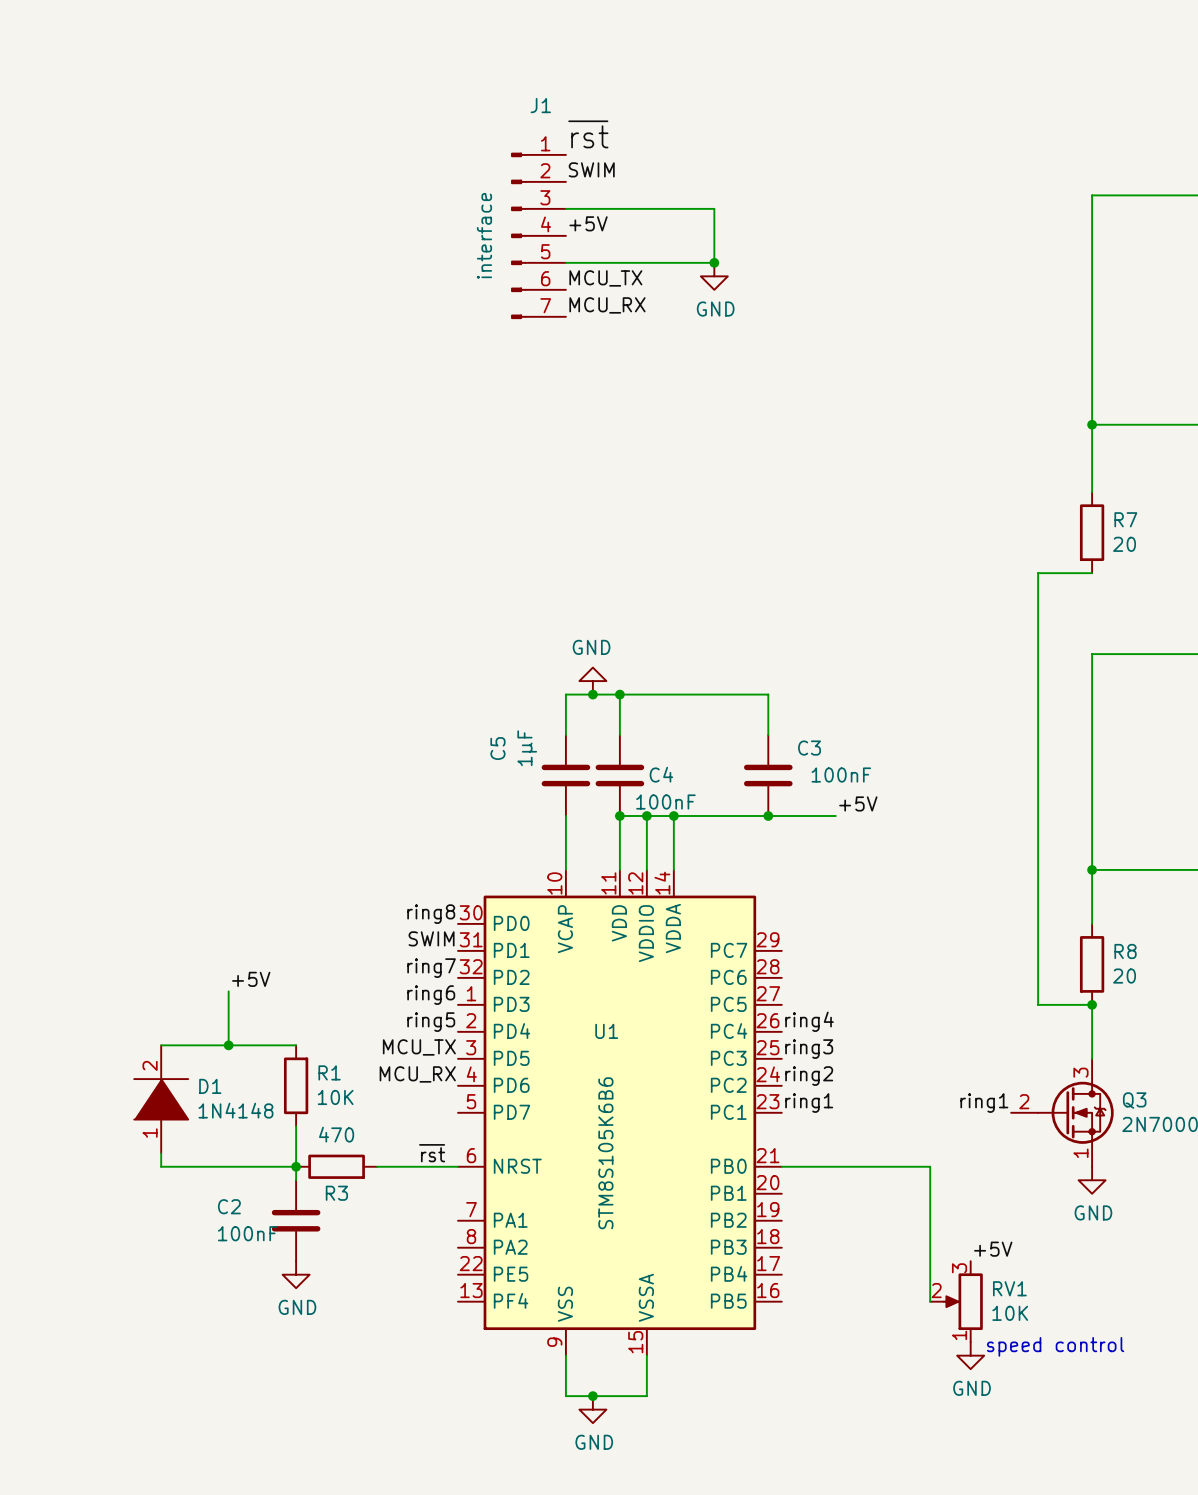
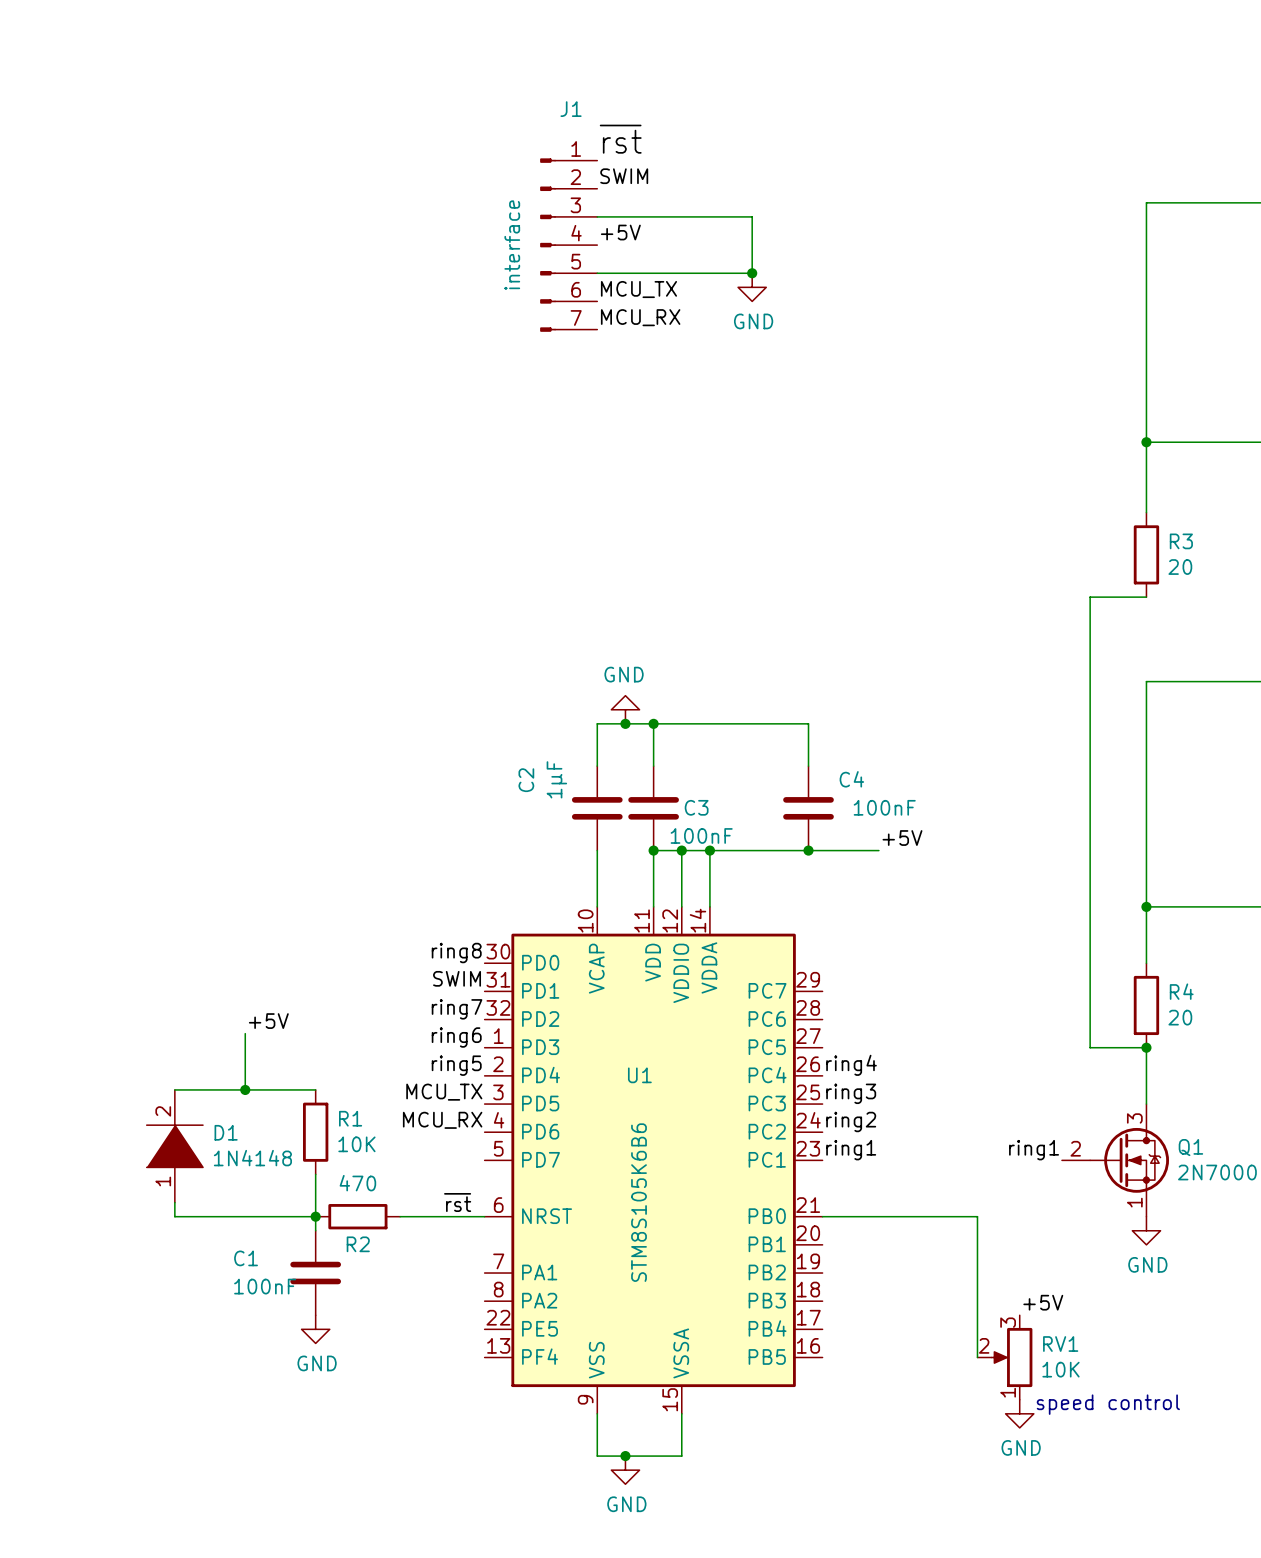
R7 name: R7 (1125, 519) -> R3 (1181, 541)
C5 name: C5 (497, 748) -> C2 (526, 780)
C3 name: C3 (809, 748) -> C4 (851, 779)
C4 name: C4 (661, 774) -> C3 (696, 807)
R8 name: R8 (1125, 951) -> R4 (1181, 991)
Q3 name: Q3 (1134, 1100) -> Q1 (1190, 1147)
R3 name: R3 (336, 1193) -> R2 (358, 1244)
C2 name: C2 (229, 1206) -> C1 (246, 1258)

